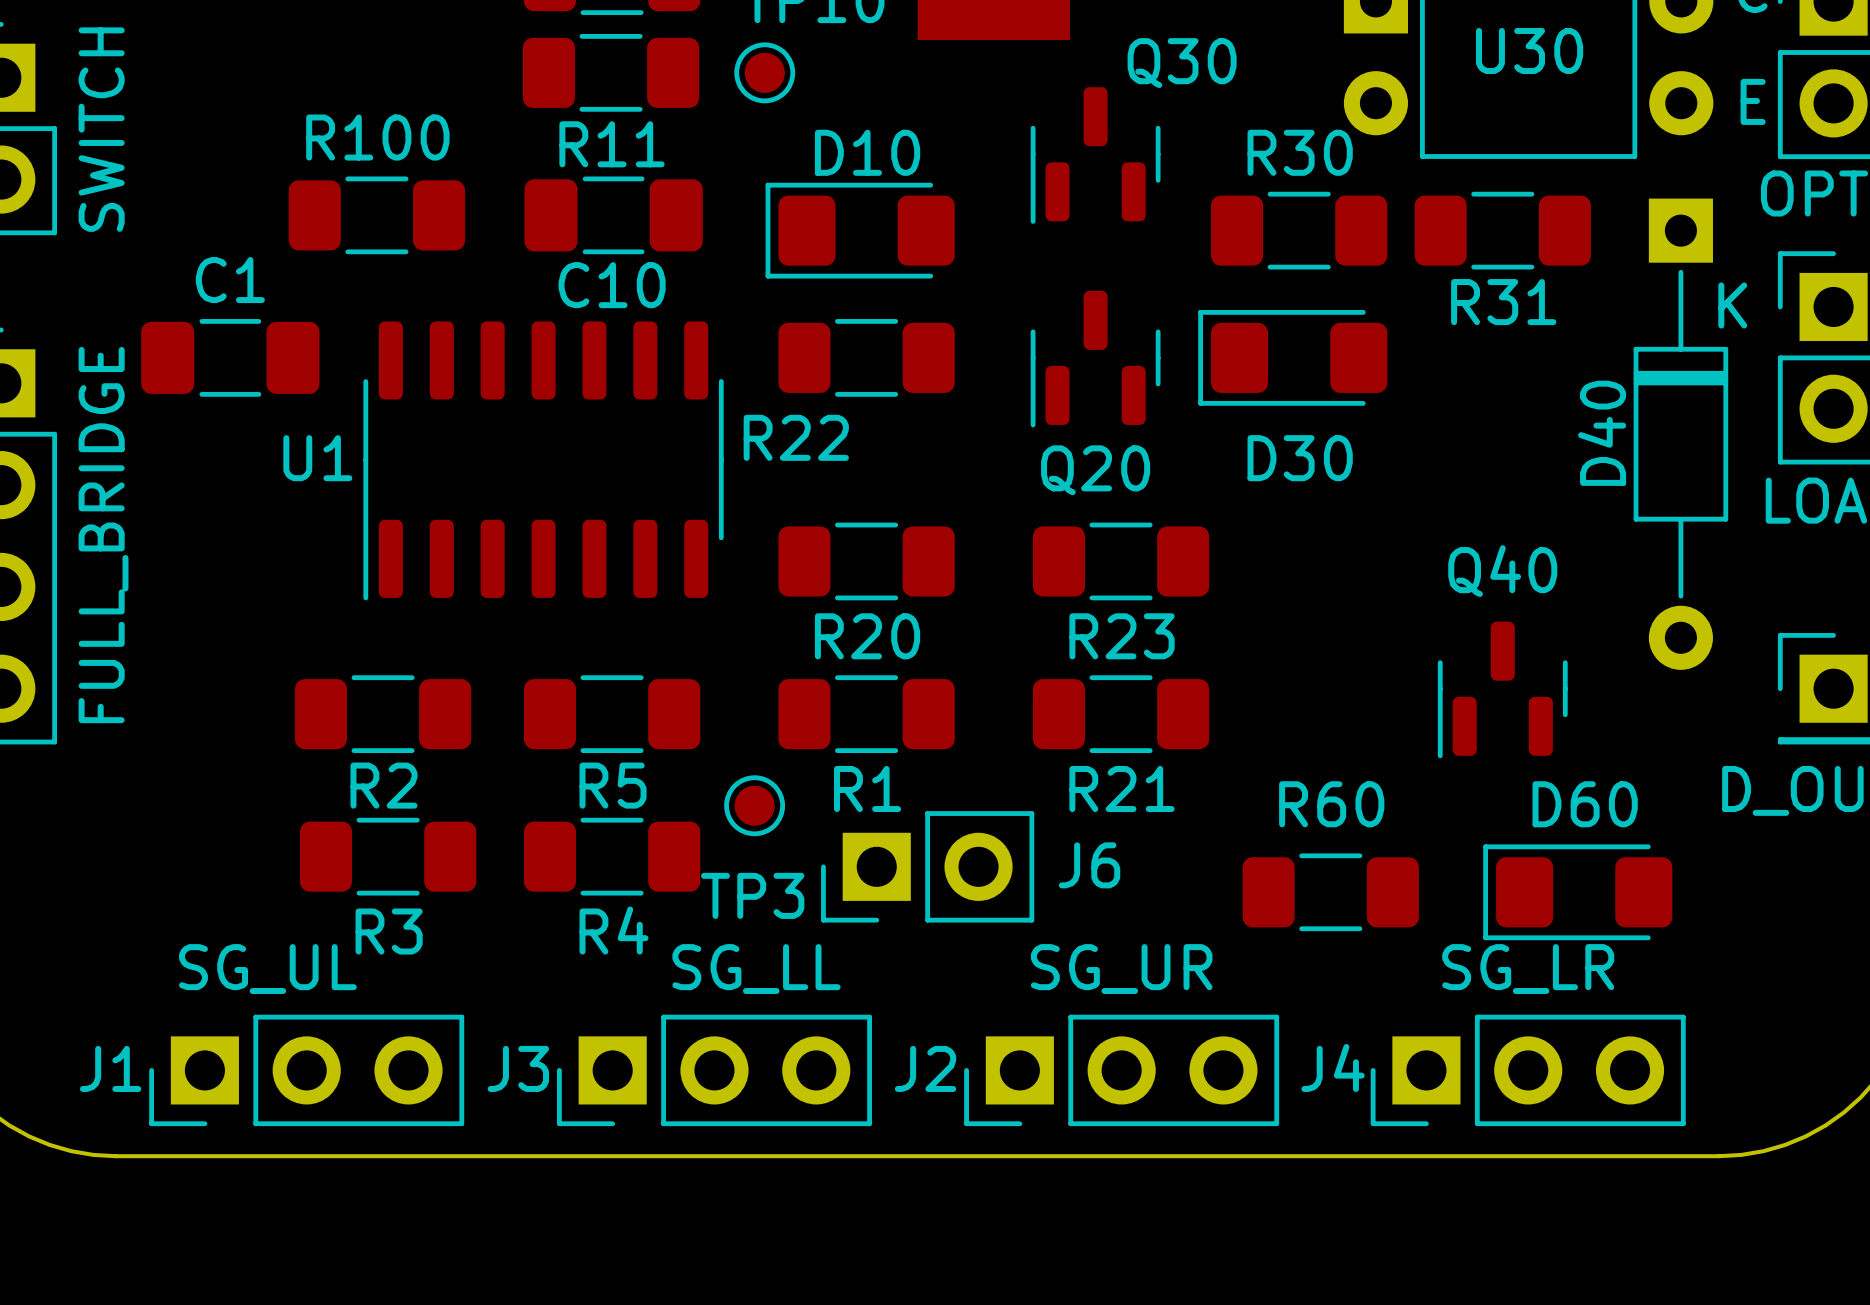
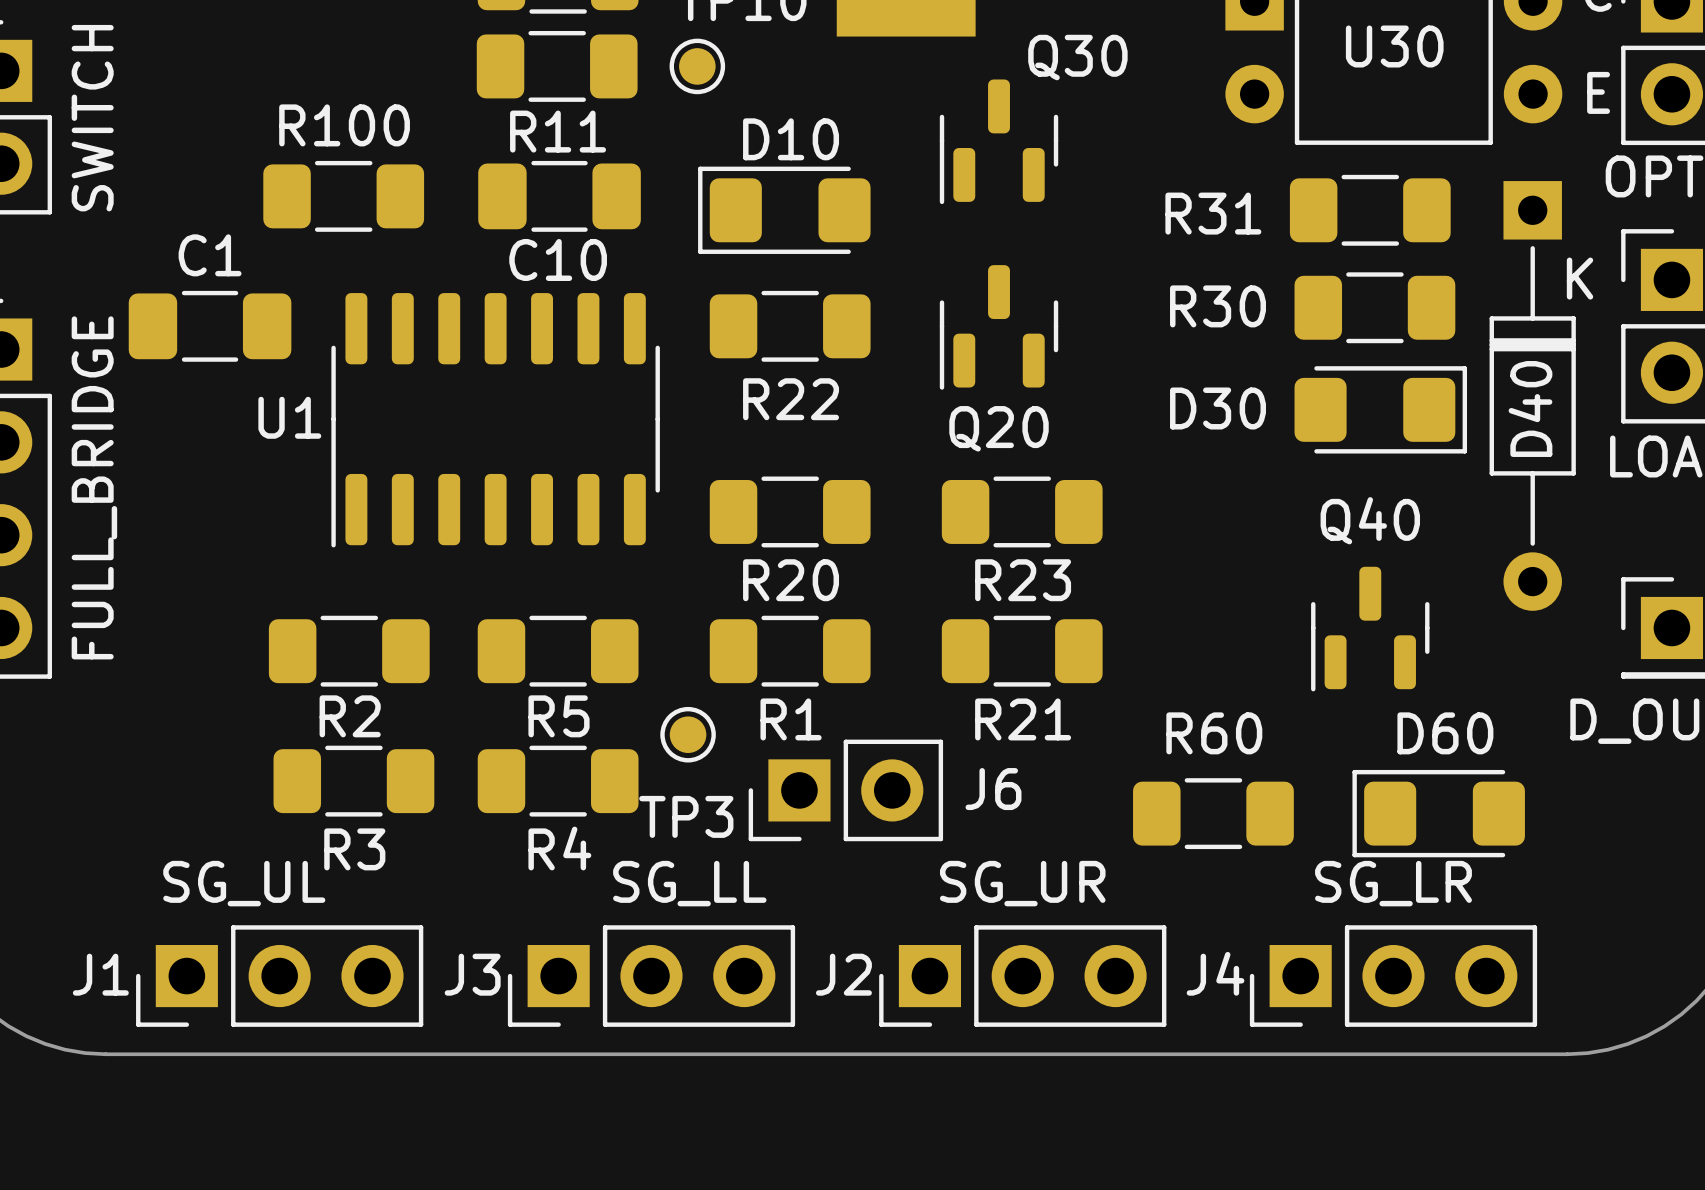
R30 name position: R30 (1300, 152) -> R30 (1218, 306)
R30 position: (1299, 230) -> (1374, 307)
R31 name position: R31 (1503, 302) -> R31 (1213, 213)
D30 rotation: 0° (1292, 357) -> 180° (1380, 409)
D30 position: (1292, 357) -> (1380, 409)
D40 name position: D40 (1602, 433) -> D40 (1530, 408)
R22 name position: R22 (796, 437) -> R22 (791, 399)
D30 name position: D30 (1300, 458) -> D30 (1218, 408)

